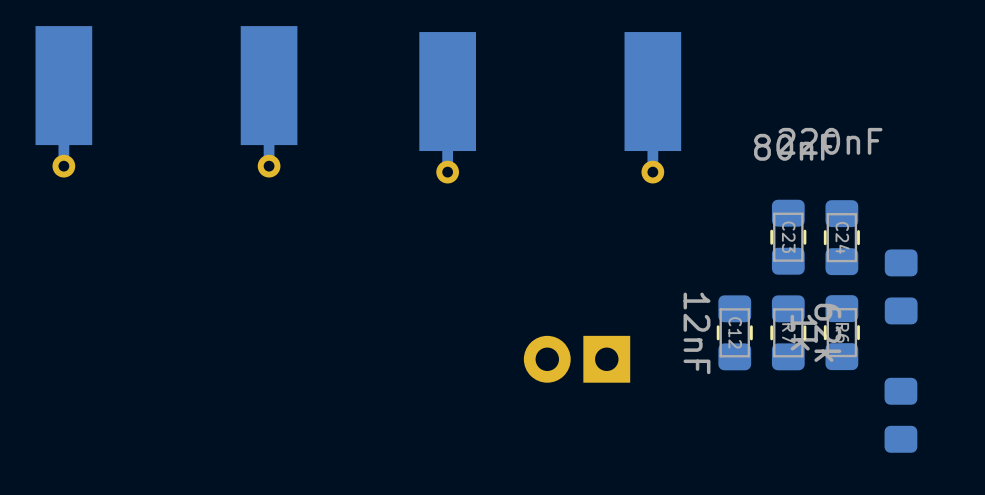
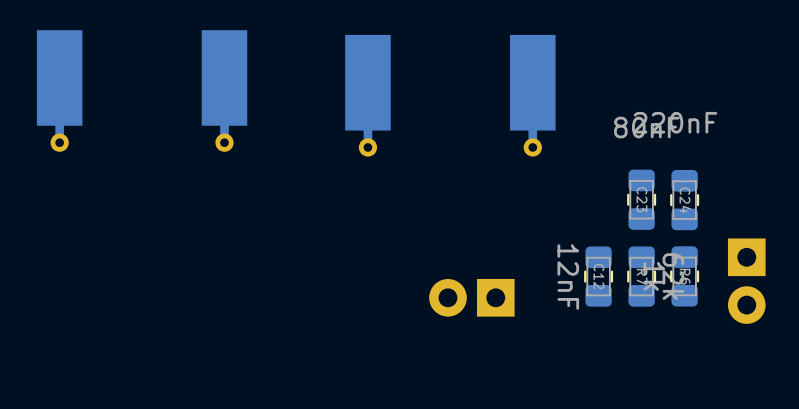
part: (901, 286) -> none
part: none -> (746, 281)
part: (900, 415) -> none

